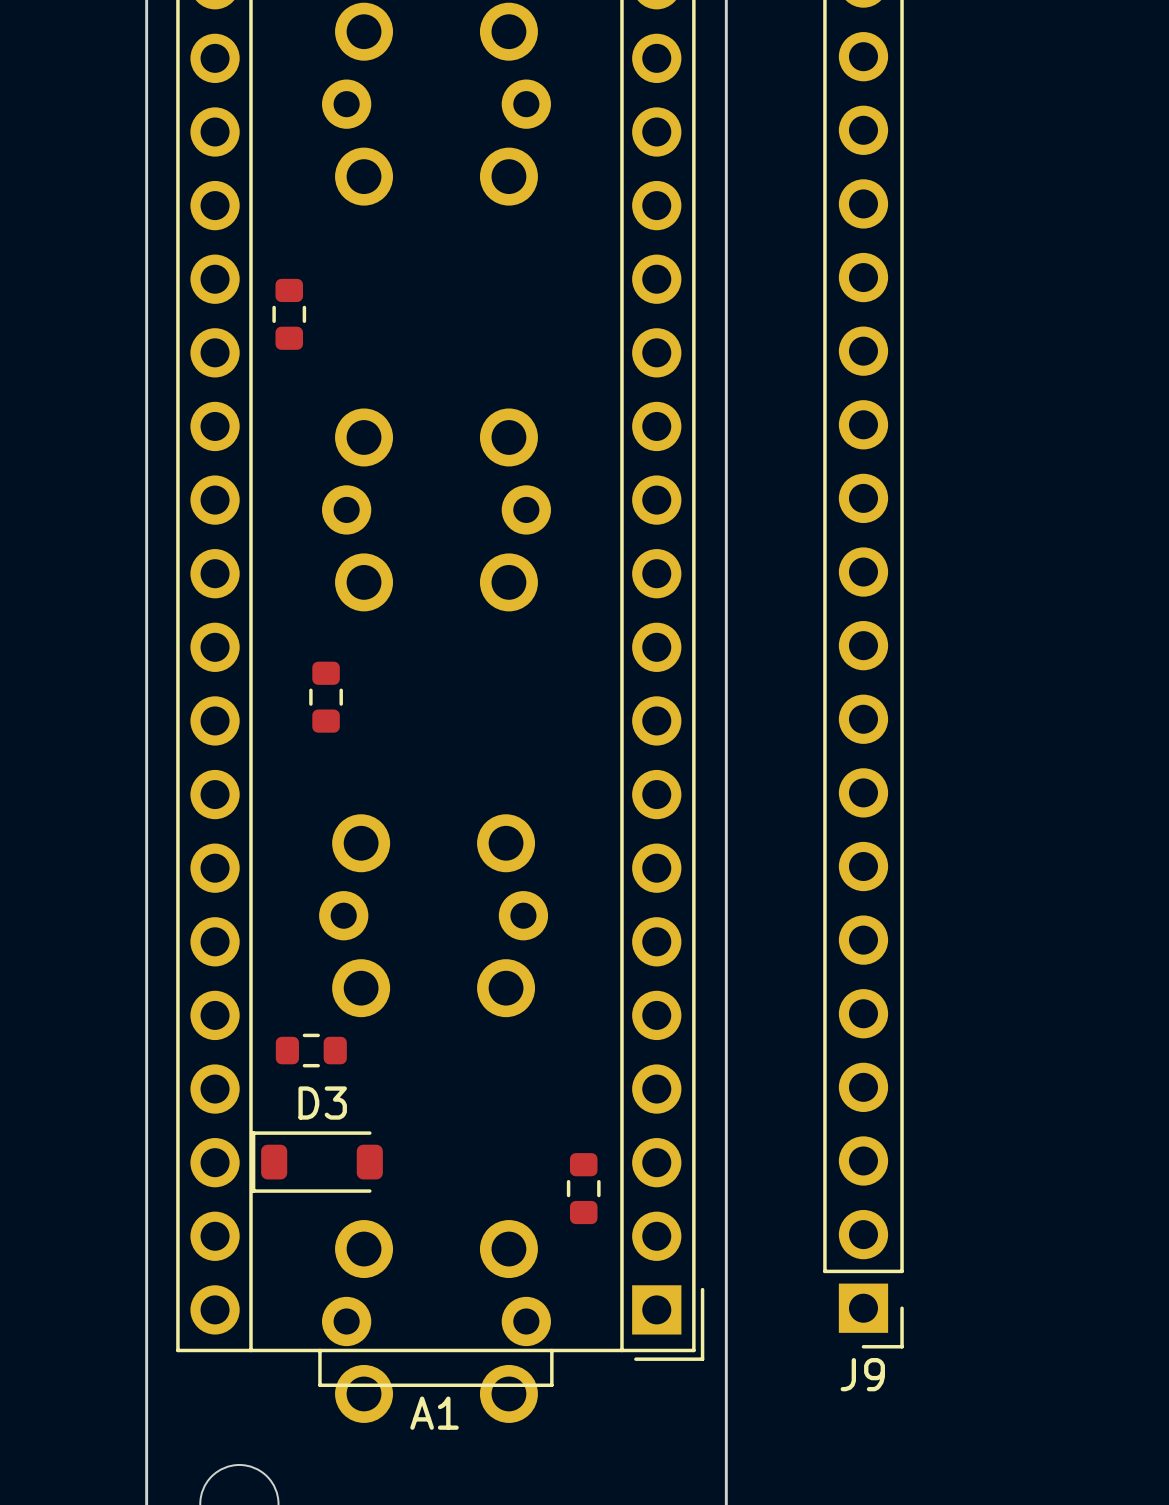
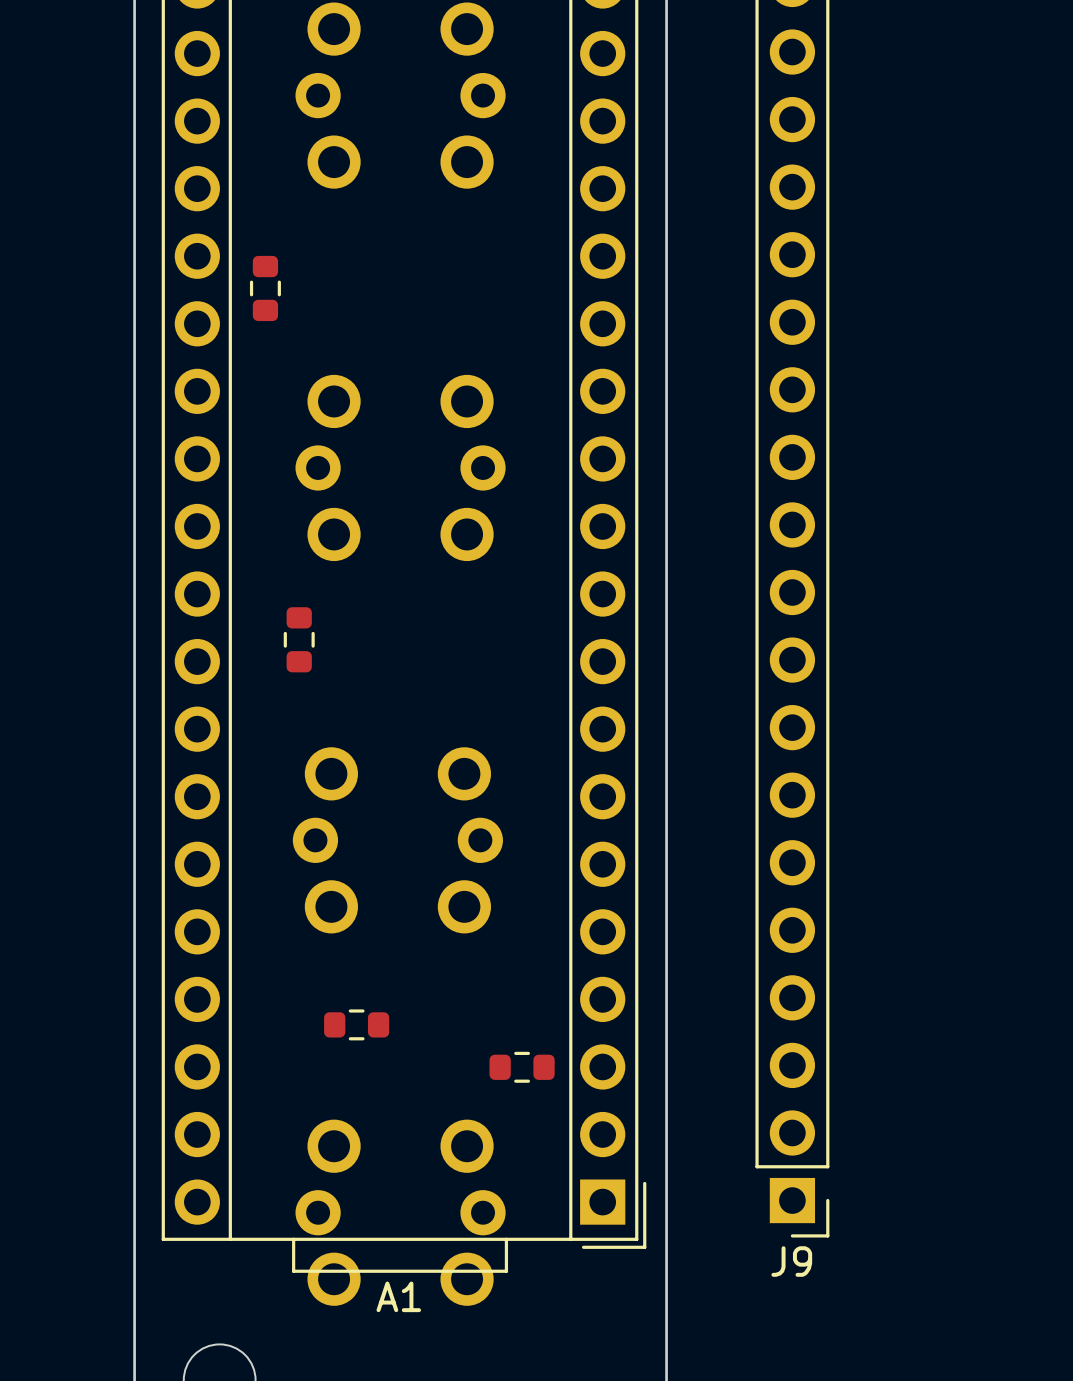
part position: (311, 1050) -> (356, 1024)
D3: (317, 1162) -> none
part rotation: 0° (583, 1188) -> 90° clockwise (522, 1067)

